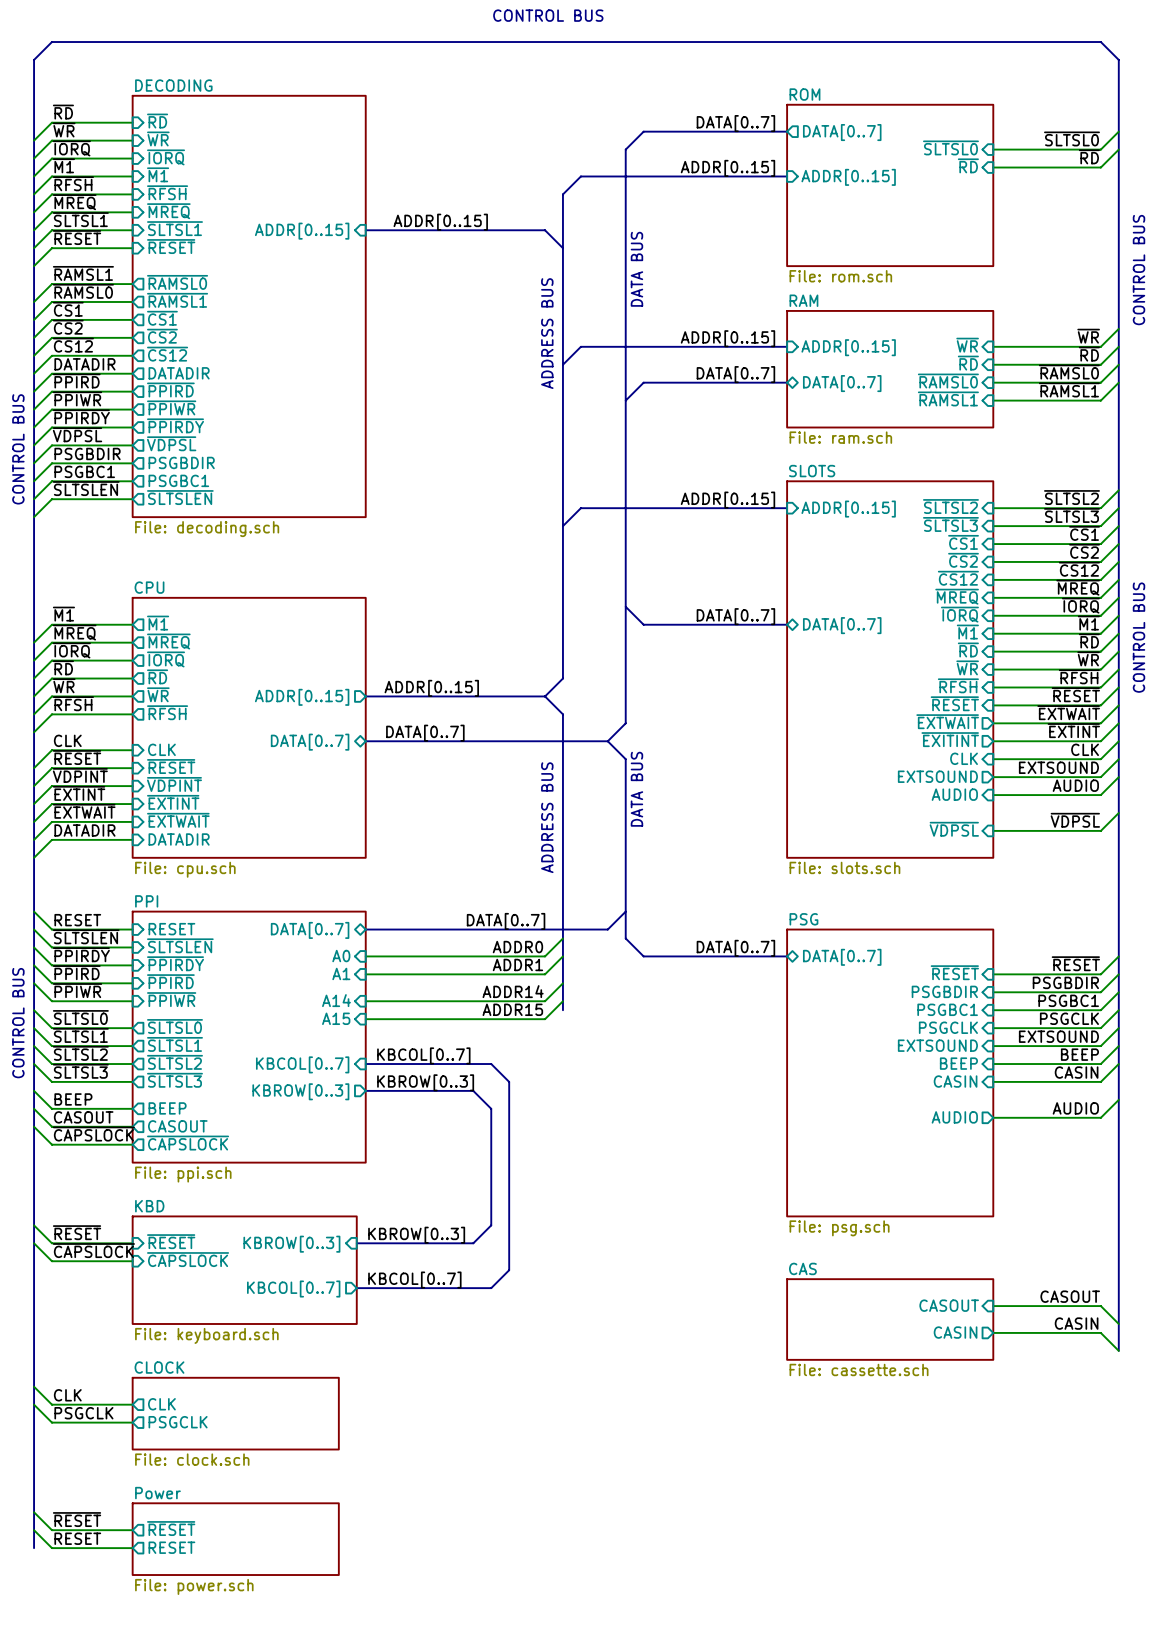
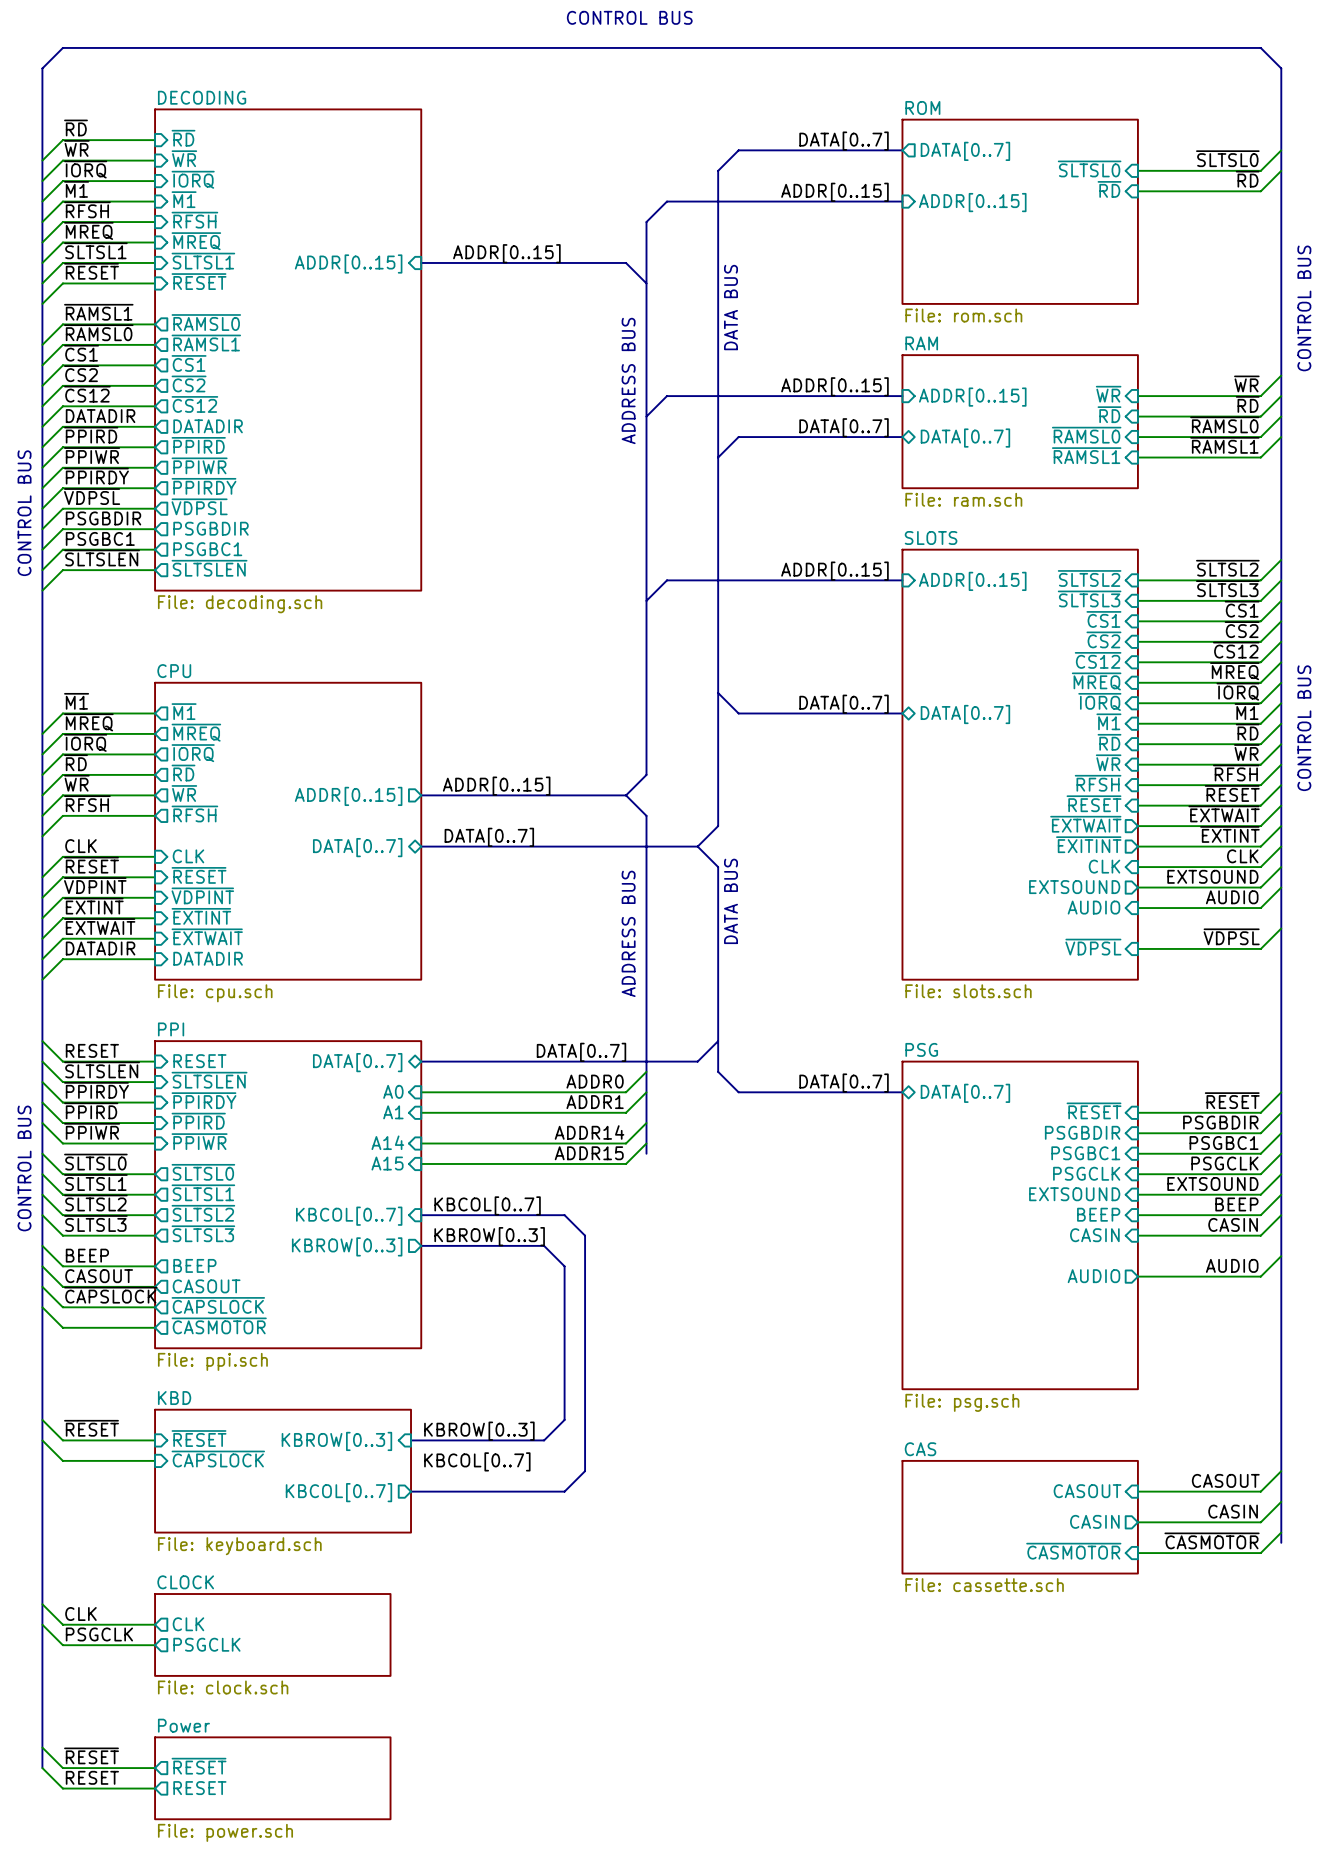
sheet PPI: File: ppi.sch (249, 1037) -> none
sheet PPI: none -> File: ppi.sch (288, 1194)
wire: none -> (42, 1307) (62, 1327) (155, 1327)
sheet pin: none -> ~{CASMOTOR} (219, 1325)
wire: (34, 1225) (51, 1243) (132, 1243) -> (42, 1440) (62, 1460) (155, 1460)
bus: (491, 1225) (473, 1243) (356, 1243) -> (564, 1399) (564, 1419) (544, 1440) (411, 1440)
label: ~{RESET} (77, 1232) -> none
label position: KBROW[0..3] (416, 1235) -> KBROW[0..3] (479, 1431)
sheet pin: ~{RESET} (171, 1241) -> none
sheet pin position: KBROW[0..3] (291, 1244) -> KBROW[0..3] (336, 1441)
label: ~{CAPSLOCK} (93, 1250) -> ~{RESET} (91, 1428)
sheet pin: ~{CAPSLOCK} (188, 1259) -> ~{RESET} (199, 1438)
sheet KBD position: (244, 1270) -> (283, 1471)
bus: (509, 1270) (491, 1288) (356, 1288) -> (585, 1450) (585, 1471) (564, 1491) (411, 1491)
sheet pin: none -> ~{CAPSLOCK} (218, 1459)
sheet pin position: KBCOL[0..7] (293, 1289) -> KBCOL[0..7] (338, 1492)
wire: (1100, 1306) (1118, 1323) -> (1260, 1491) (1281, 1471)
sheet CAS: File: cassette.sch (890, 1319) -> none
sheet CAS: none -> File: cassette.sch (1020, 1517)
wire: (1100, 1332) (1118, 1350) -> (1260, 1522) (1281, 1501)
wire: none -> (1281, 1532) (1260, 1553) (1137, 1553)
label: none -> ~{CASMOTOR} (1212, 1540)
sheet pin: none -> ~{CASMOTOR} (1073, 1551)
wire: (34, 1386) (51, 1404) (132, 1404) -> (42, 1624) (62, 1645) (155, 1645)
label: CLK (67, 1395) -> none
sheet pin: CLK (161, 1404) -> none
label: PSGCLK (83, 1413) -> CLK (80, 1614)
sheet CLOCK position: (235, 1413) -> (272, 1634)
sheet pin: PSGCLK (178, 1422) -> CLK (188, 1624)
label: none -> PSGCLK (99, 1634)
sheet pin: none -> PSGCLK (206, 1644)
wire: (34, 1512) (51, 1530) (132, 1530) -> (42, 1768) (62, 1788) (155, 1788)
label: ~{RESET} (77, 1519) -> none
sheet pin: ~{RESET} (171, 1528) -> none
label: RESET (77, 1538) -> ~{RESET} (91, 1755)
sheet Power position: (235, 1539) -> (272, 1778)
sheet pin: RESET (171, 1547) -> ~{RESET} (199, 1766)
label: none -> RESET (92, 1777)
sheet pin: none -> RESET (199, 1788)

